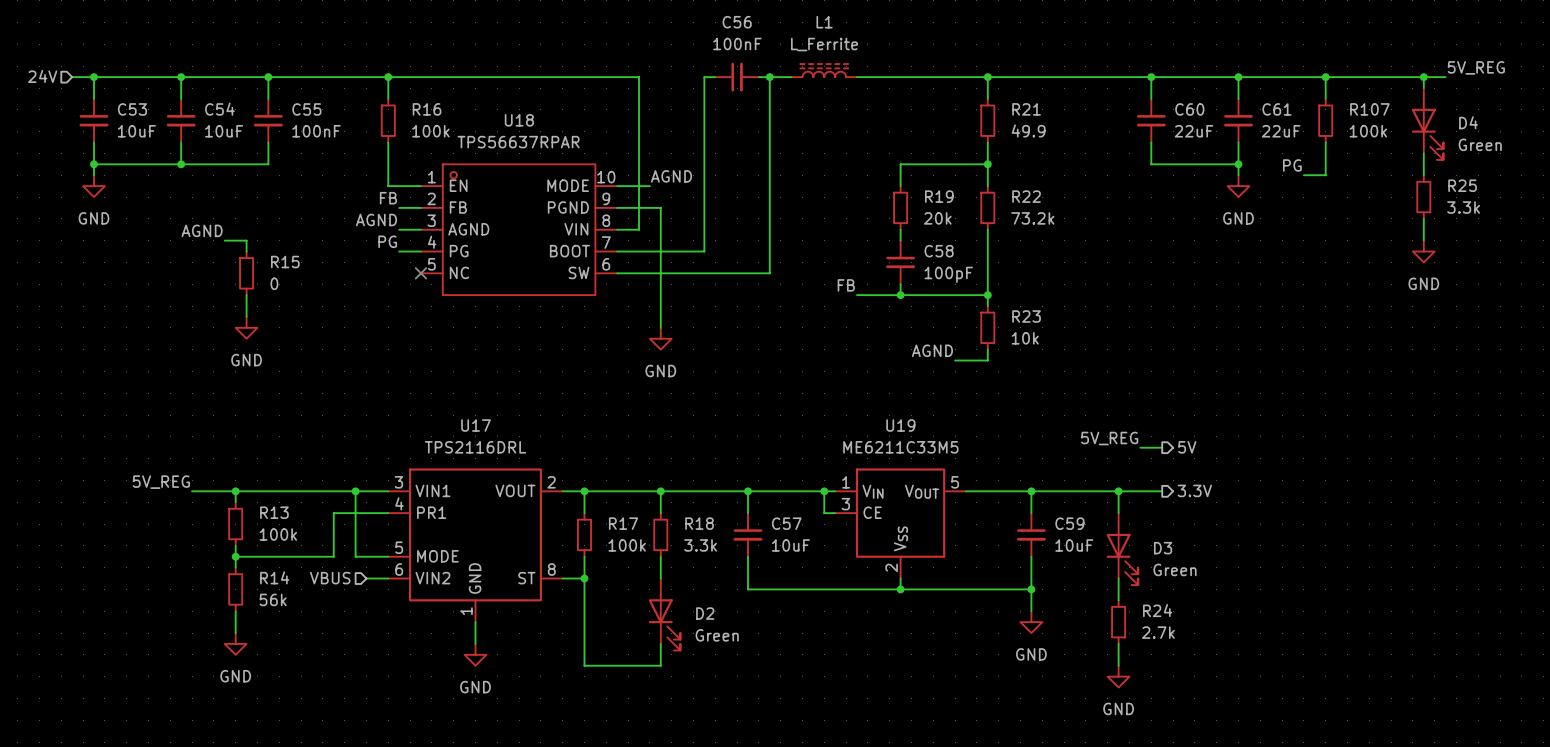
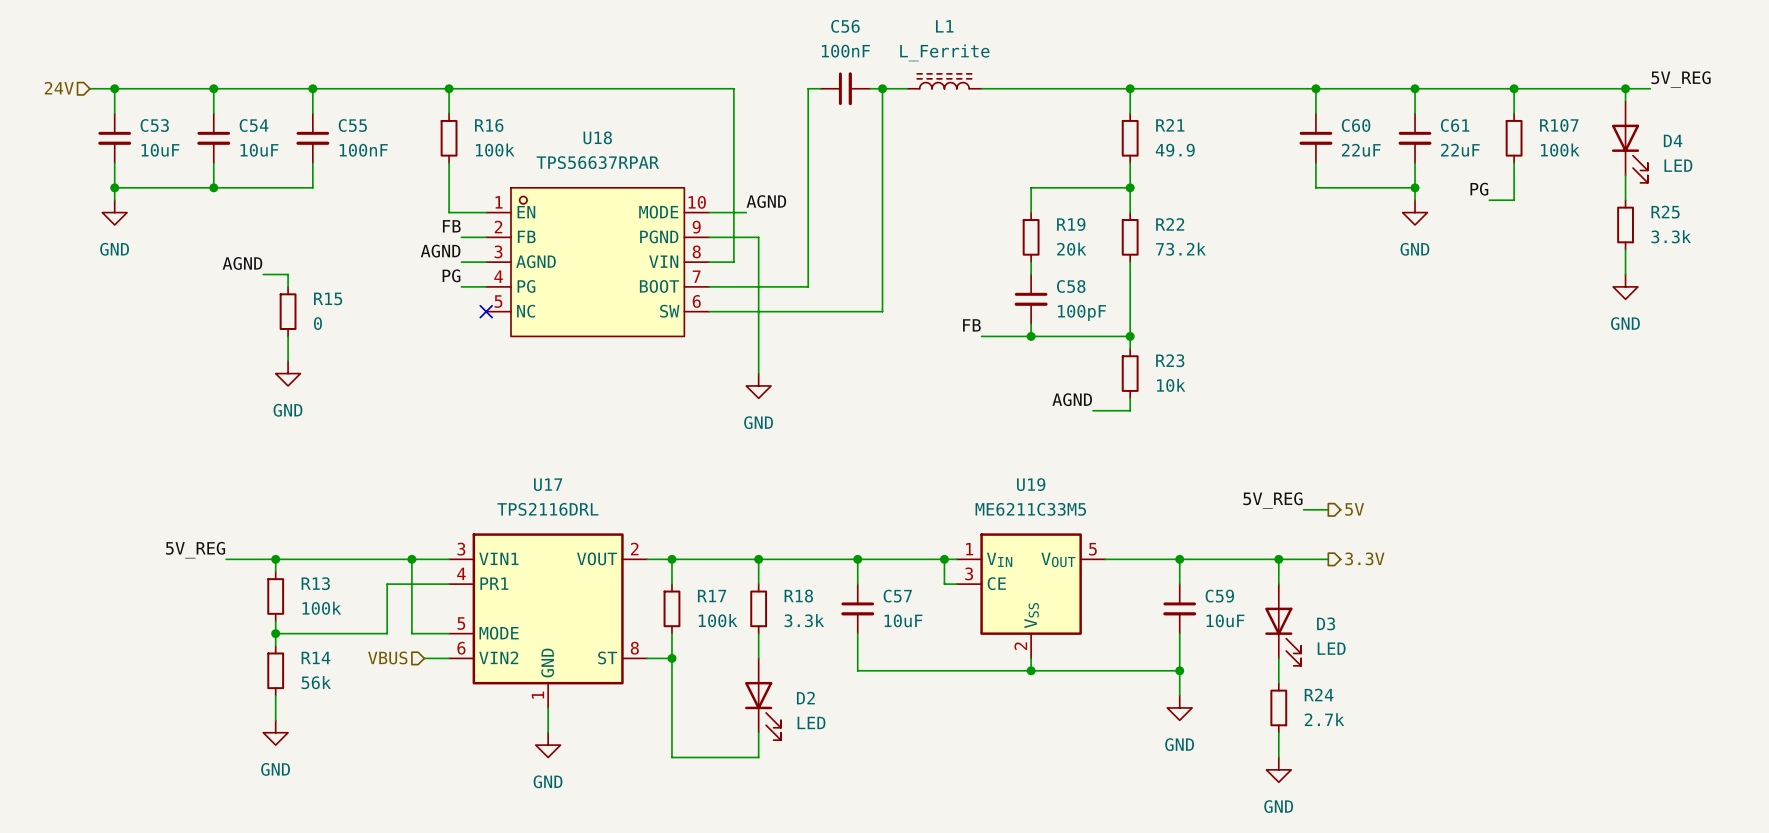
D4 value: Green (1480, 144) -> LED (1678, 165)
D3 value: Green (1175, 569) -> LED (1331, 648)
D2 value: Green (717, 635) -> LED (811, 722)

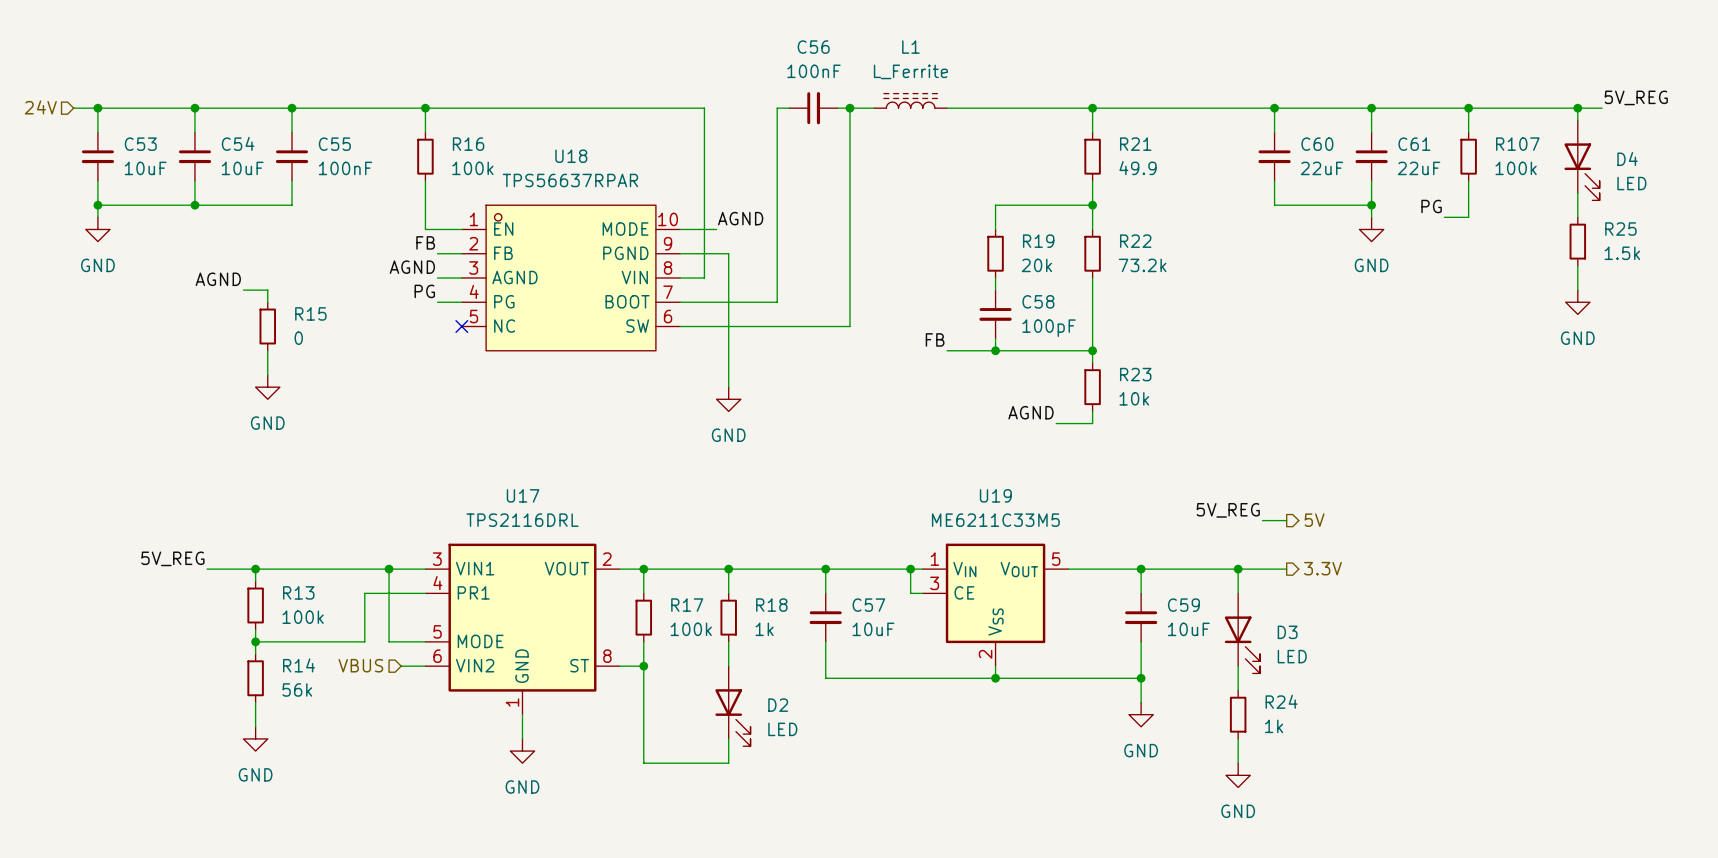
R25 value: 3.3k (1671, 236) -> 1.5k (1622, 253)
R18 value: 3.3k (804, 620) -> 1k (764, 629)
R24 value: 2.7k (1324, 719) -> 1k (1274, 726)

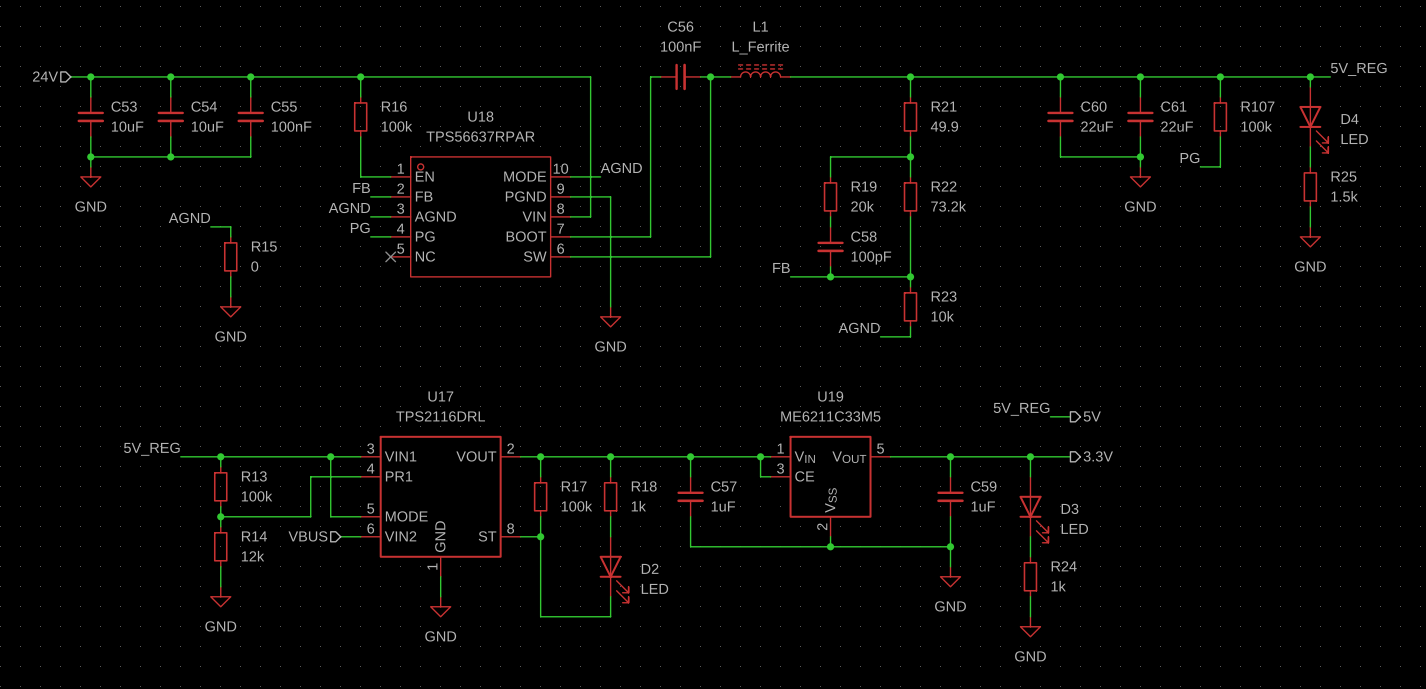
C57 value: 10uF (873, 629) -> 1uF (723, 506)
C59 value: 10uF (1188, 629) -> 1uF (983, 506)
R14 value: 56k (297, 689) -> 12k (253, 556)

